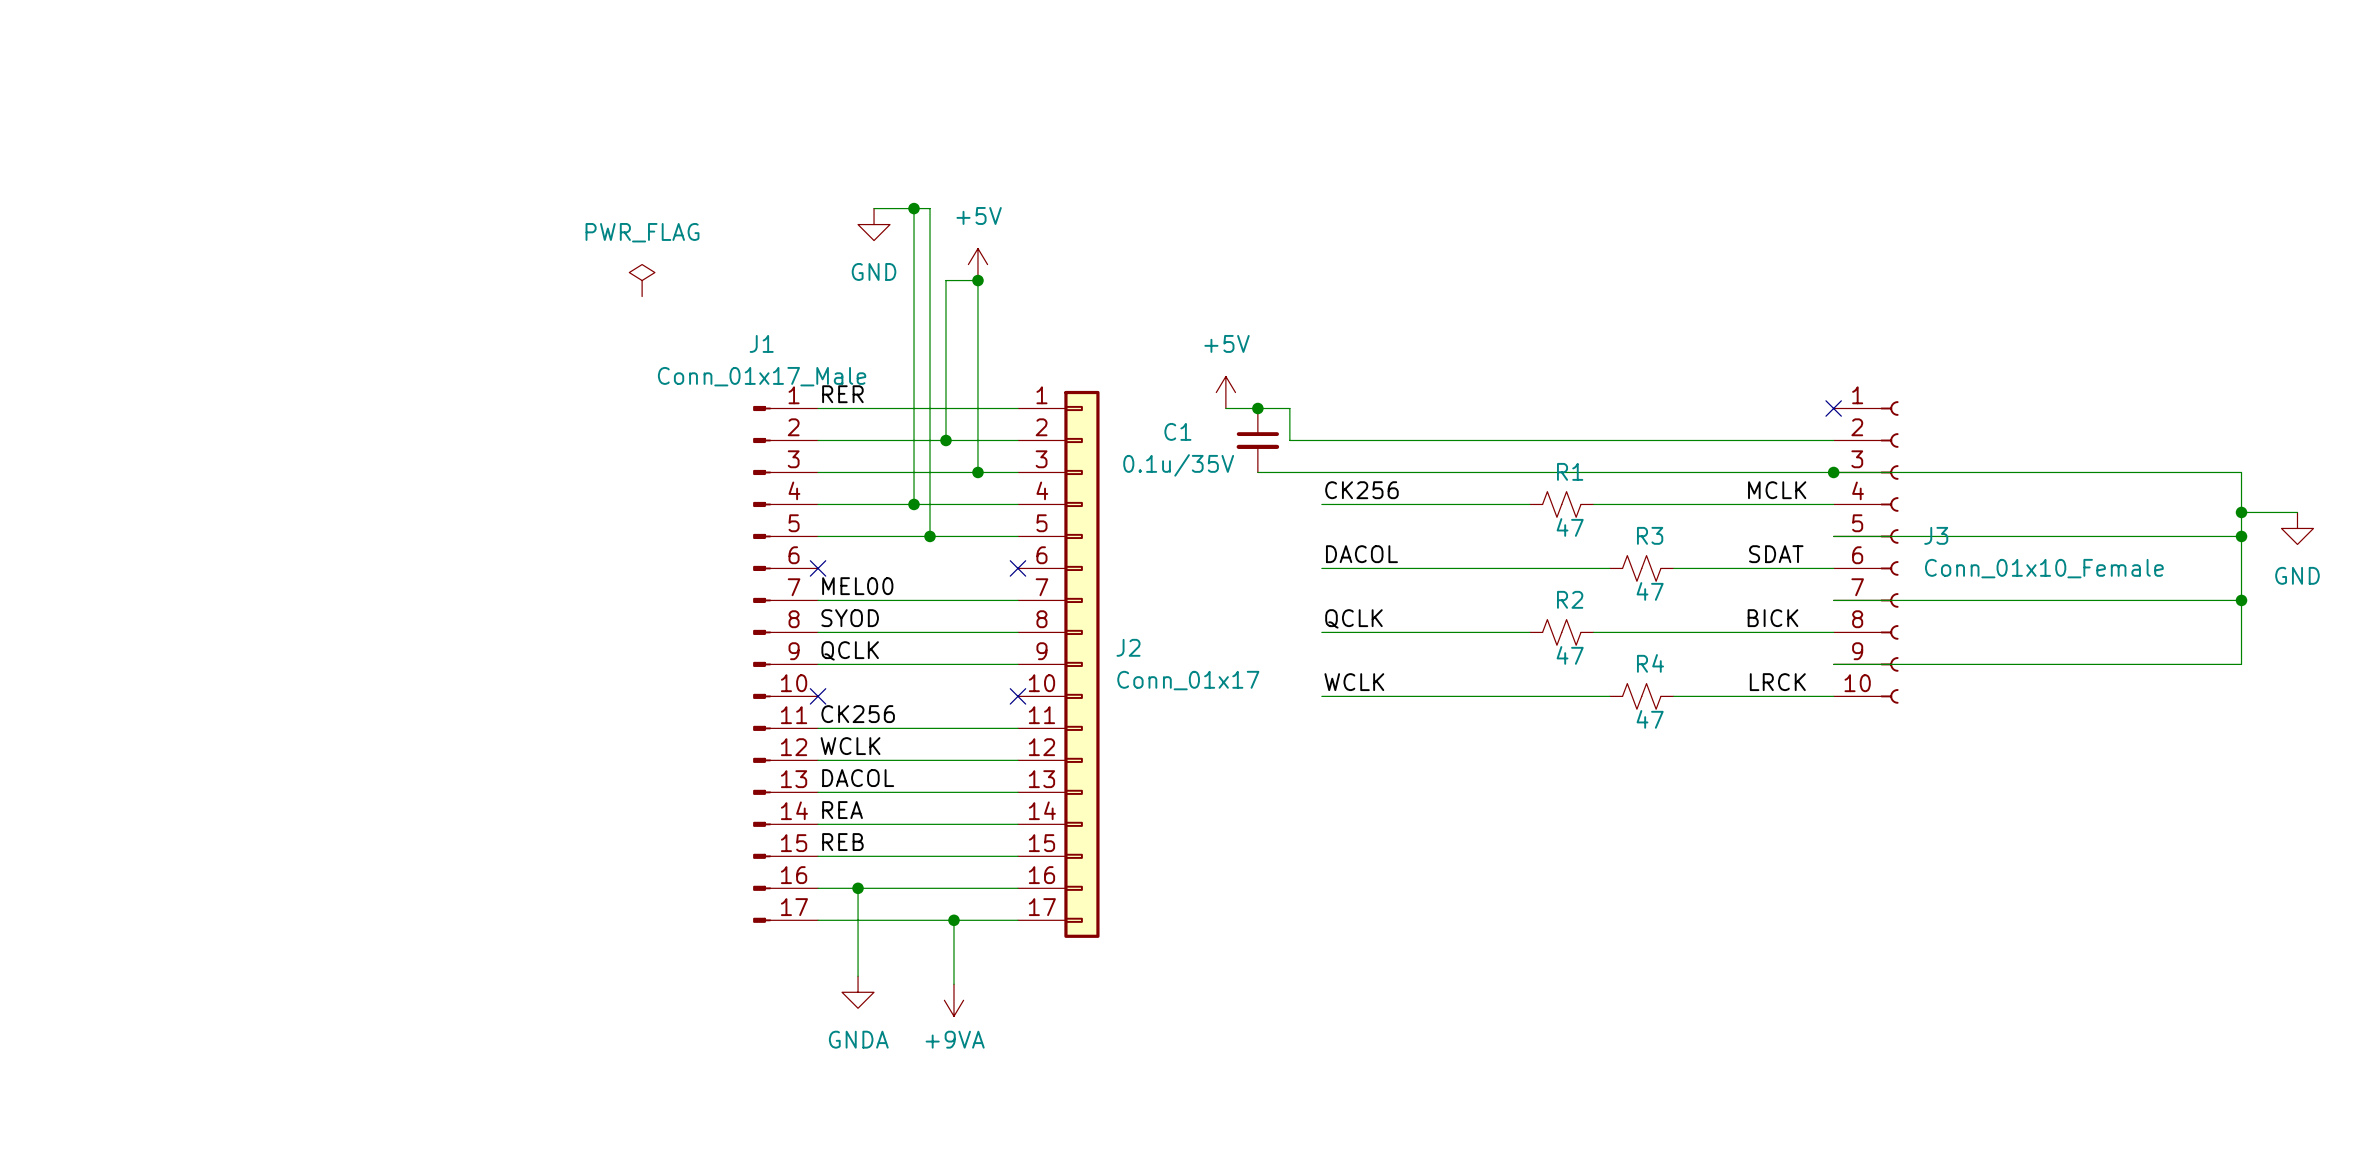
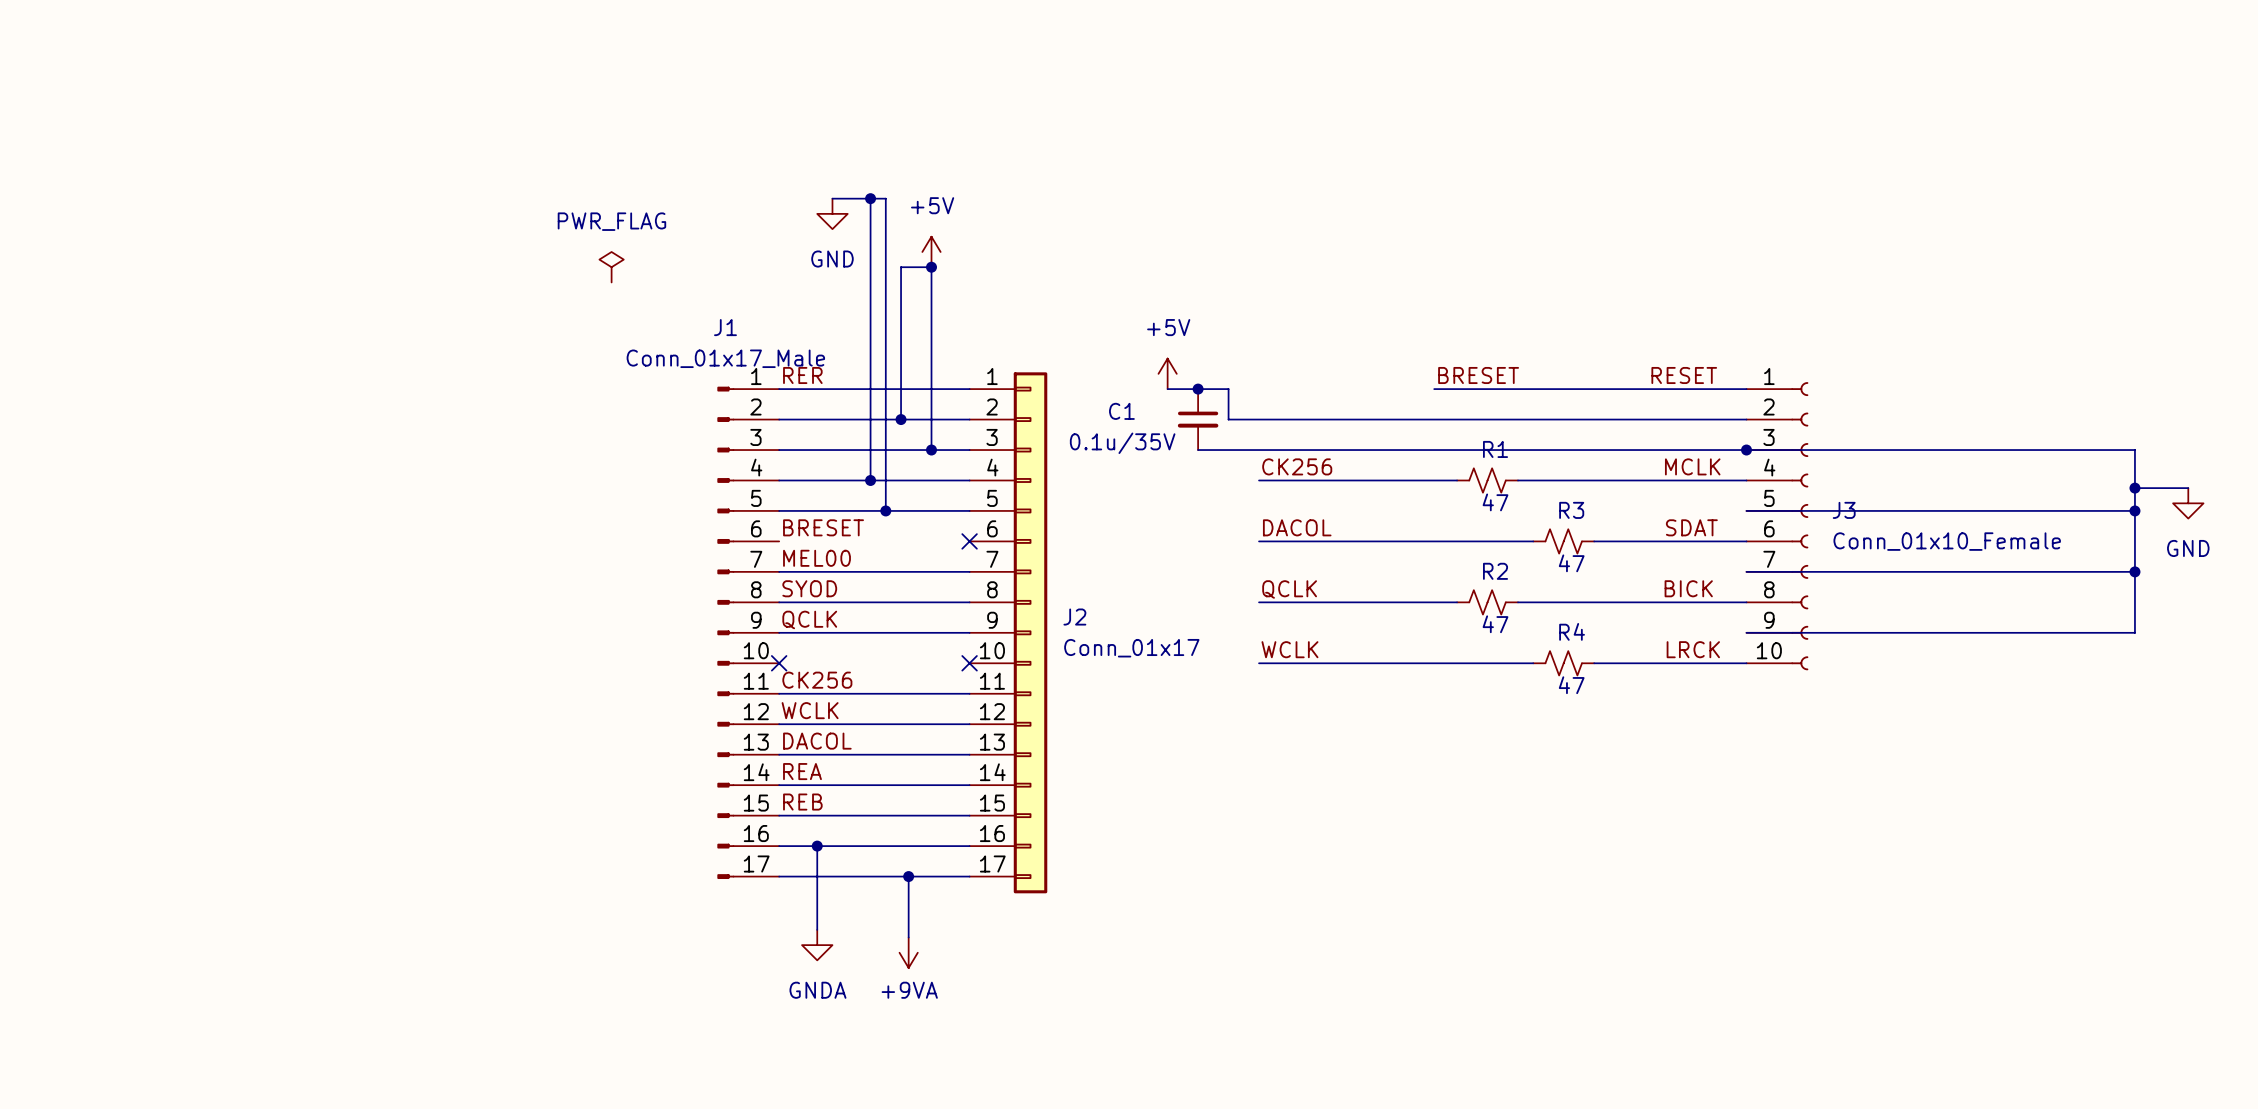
label: none -> BRESET (1478, 375)
label: none -> RESET (1684, 375)
wire: none -> (1434, 389) (1746, 389)
no-connect mark: (1833, 408) -> none
label: none -> BRESET (823, 527)
no-connect mark: (818, 568) -> none

